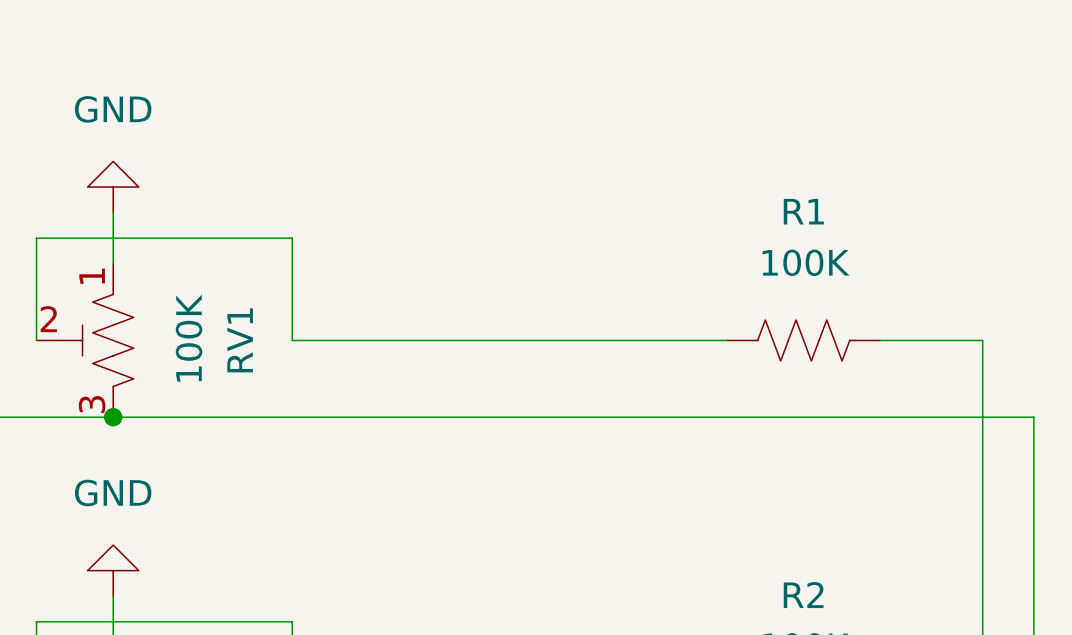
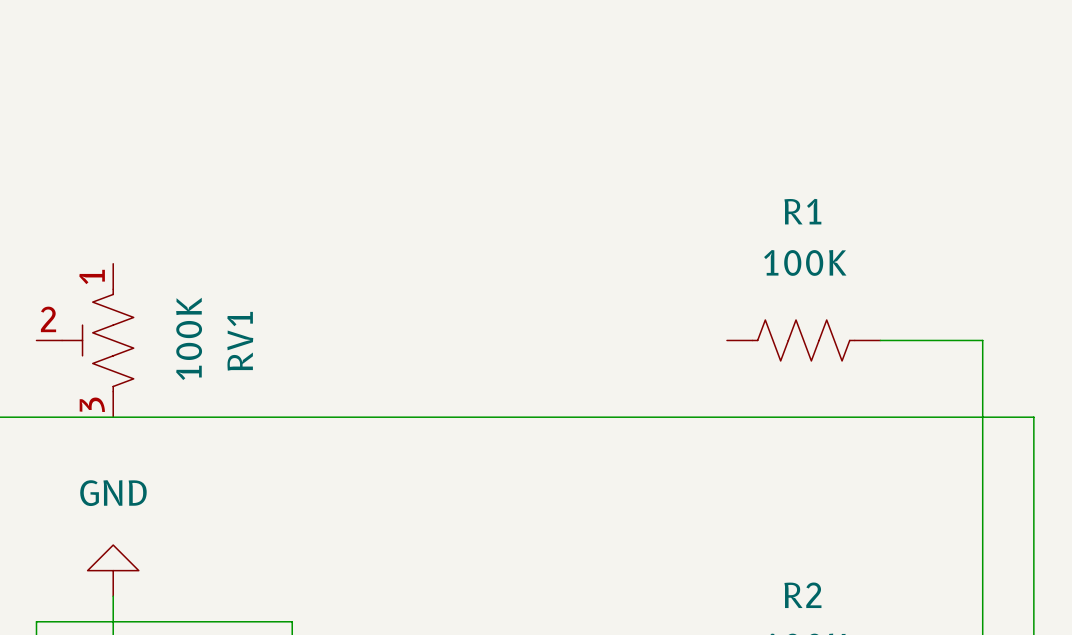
power symbol: GND (113, 187) -> none
wire: (113, 212) (113, 263) -> none
wire: (36, 340) (36, 238) (292, 238) (292, 340) (726, 340) -> none
junction: (113, 417) -> none

